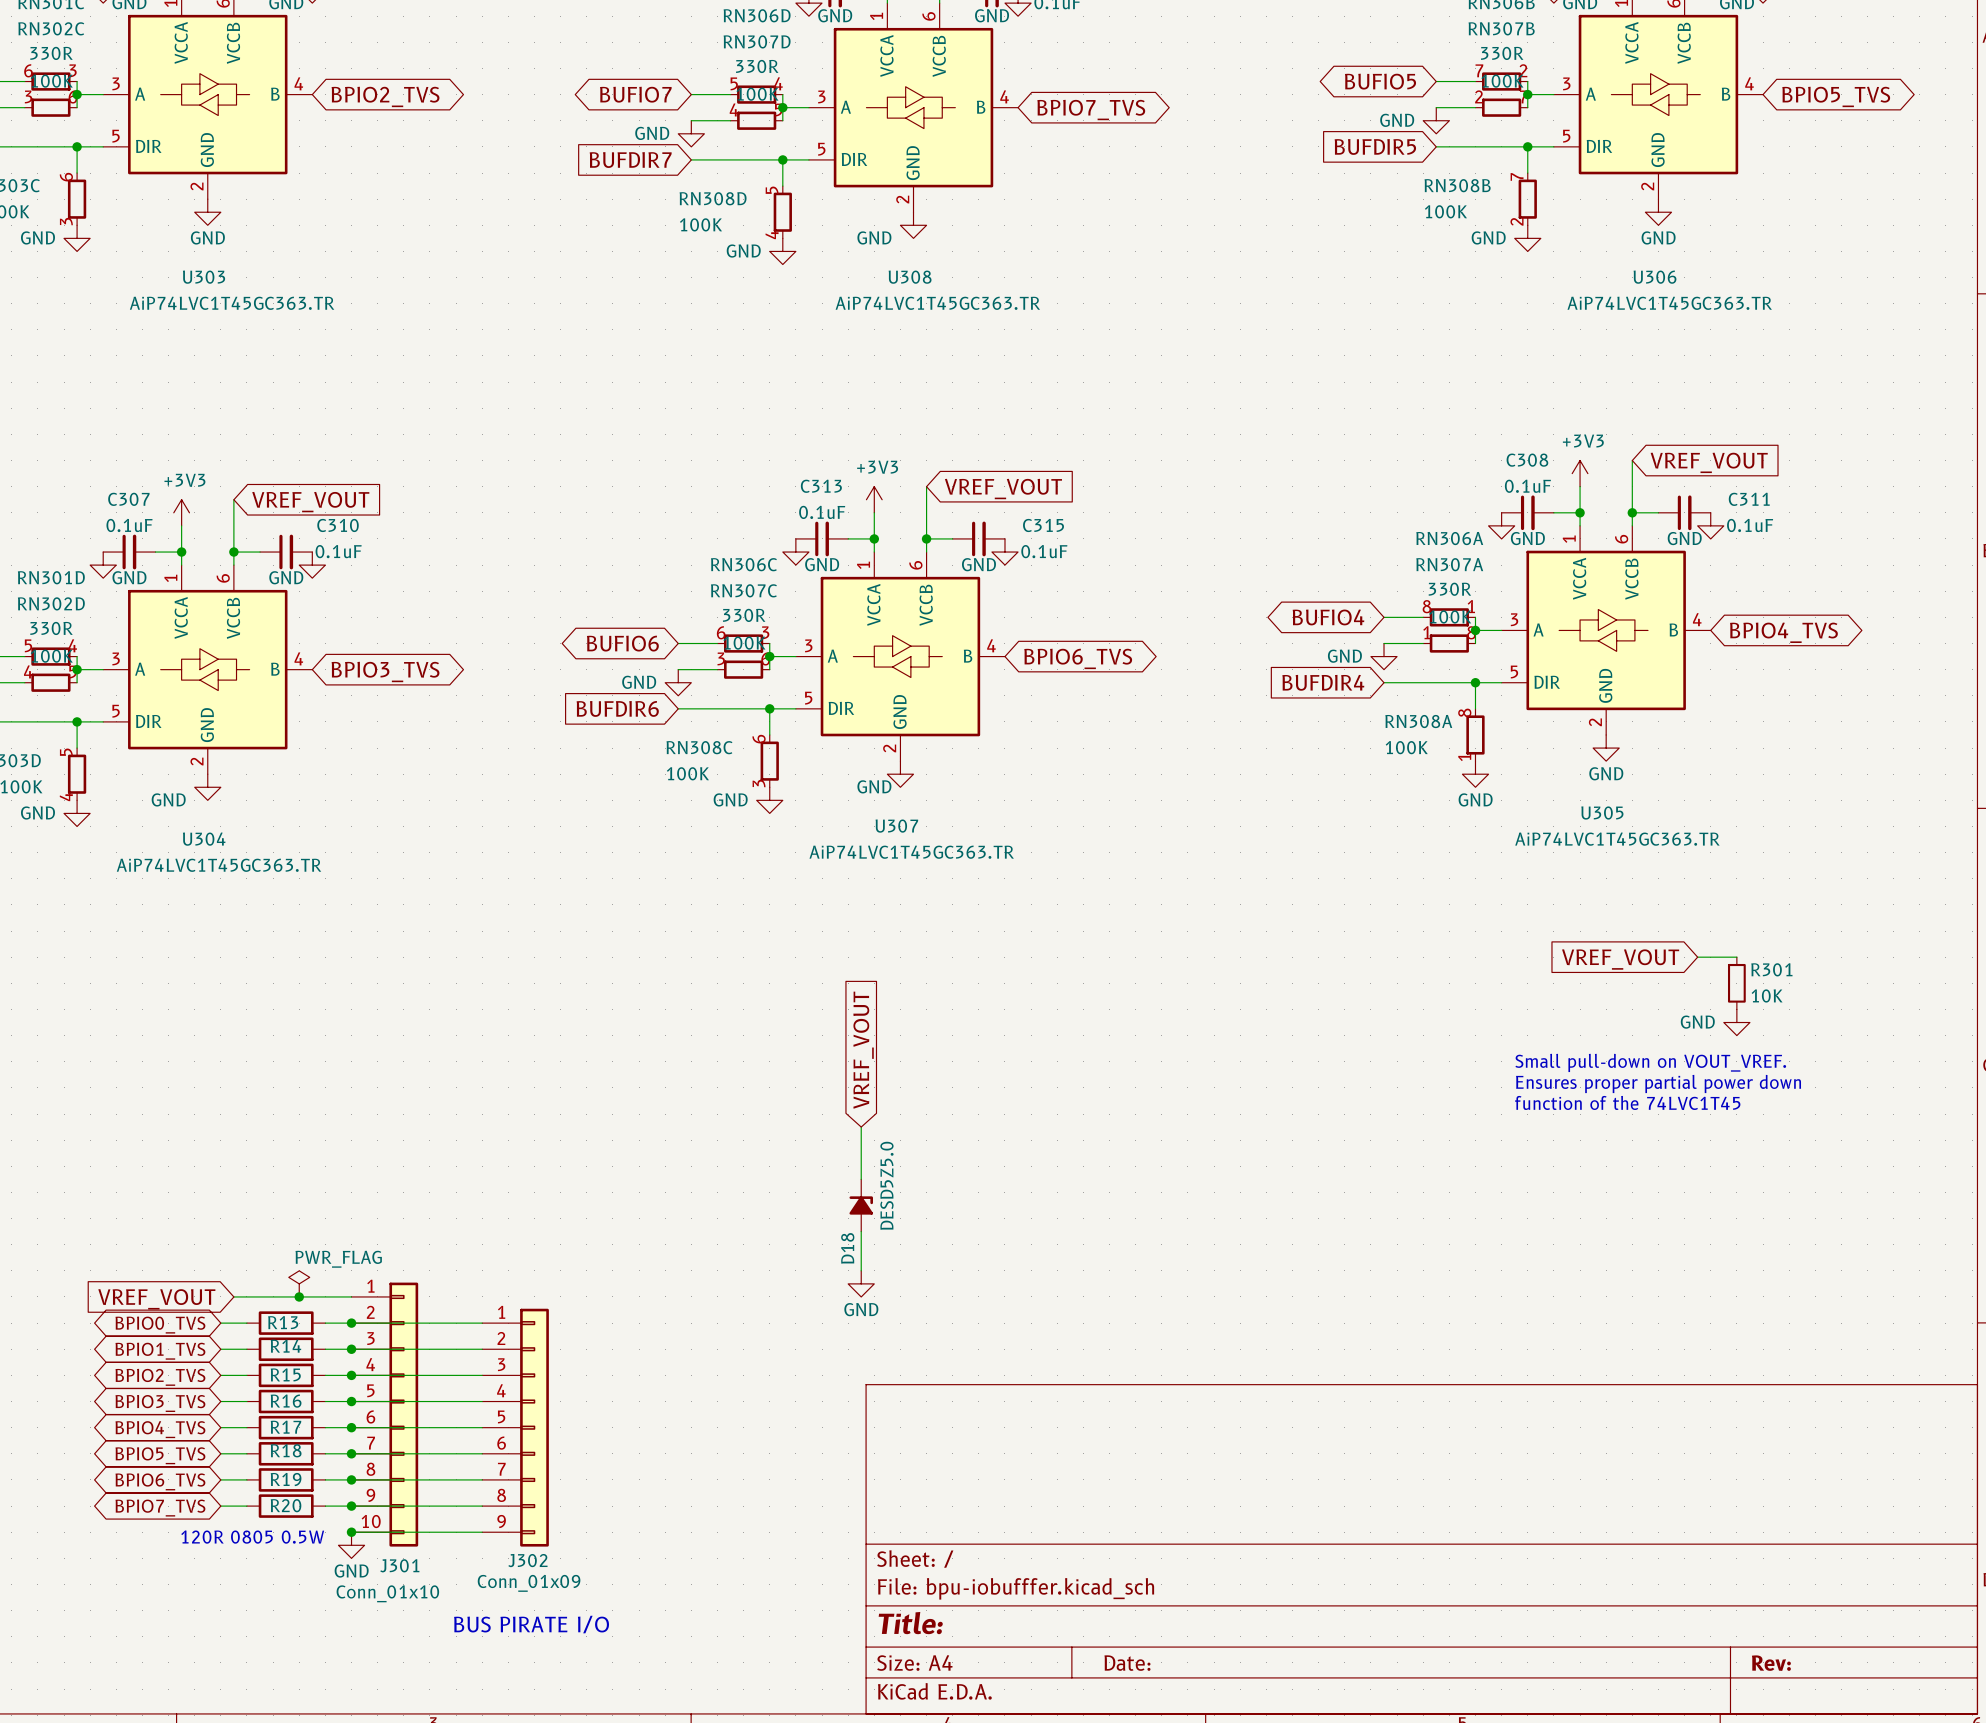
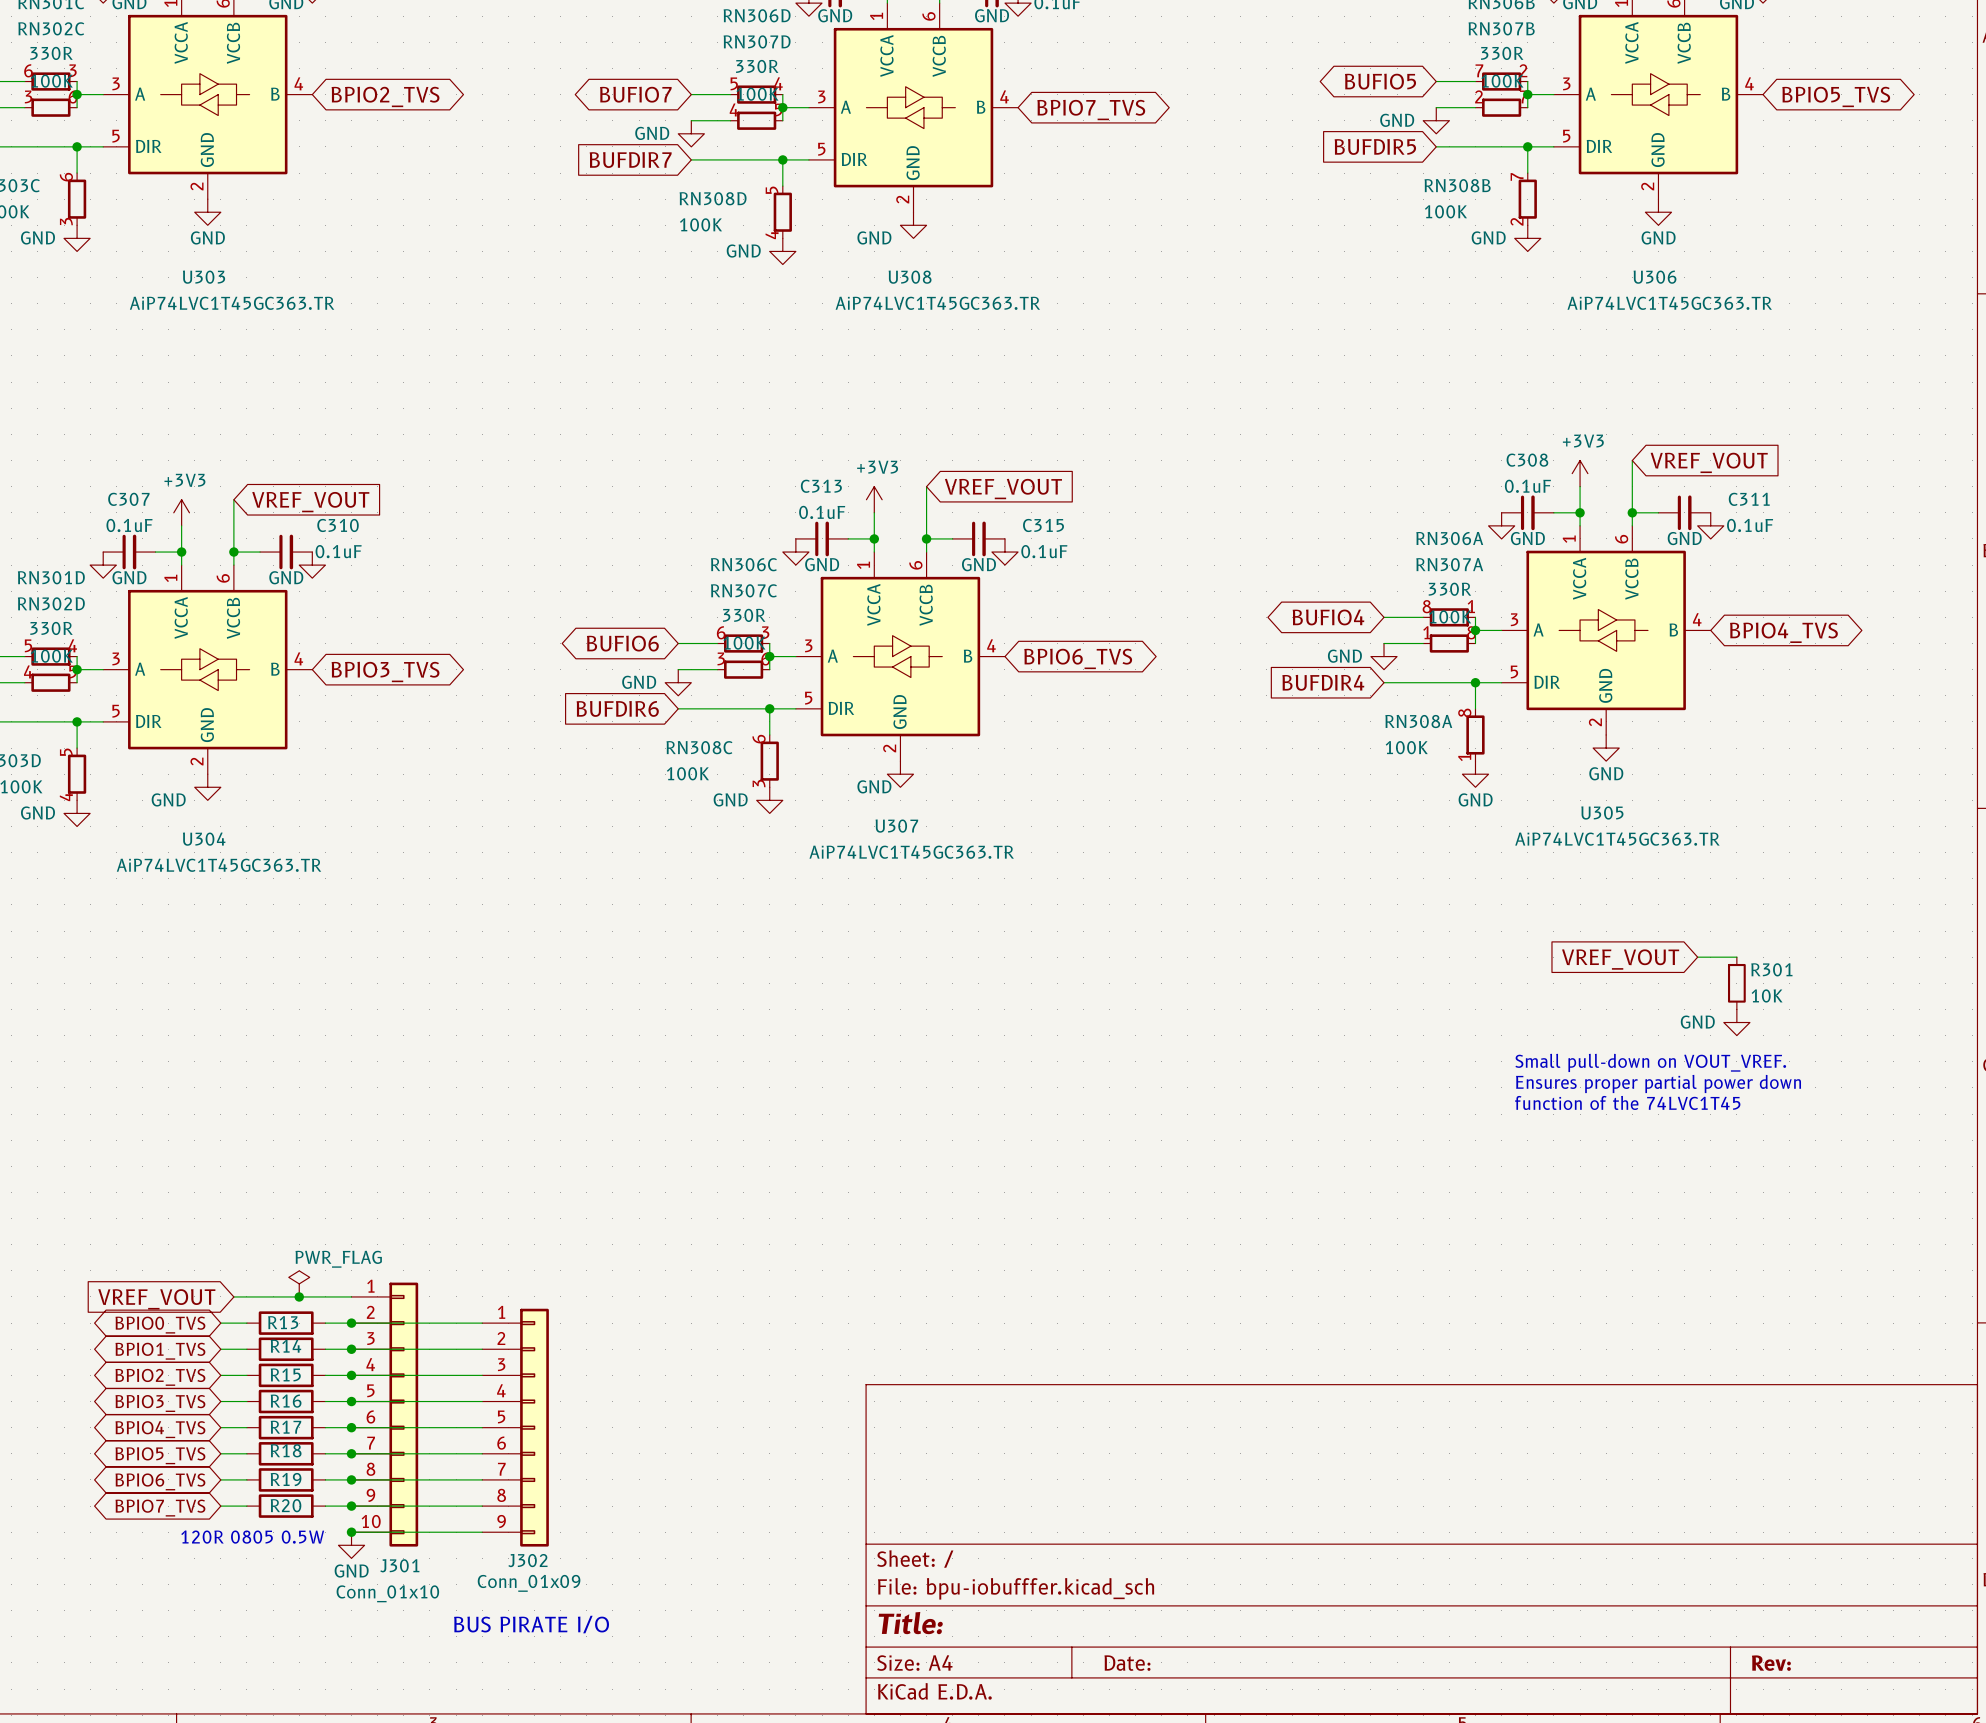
global label: VREF_VOUT (863, 1050) -> none
wire: (861, 1127) (861, 1179) -> none
D18: DESD5Z5.0 (861, 1205) -> none
wire: (861, 1231) (861, 1270) -> none
power symbol: GND (861, 1283) -> none

